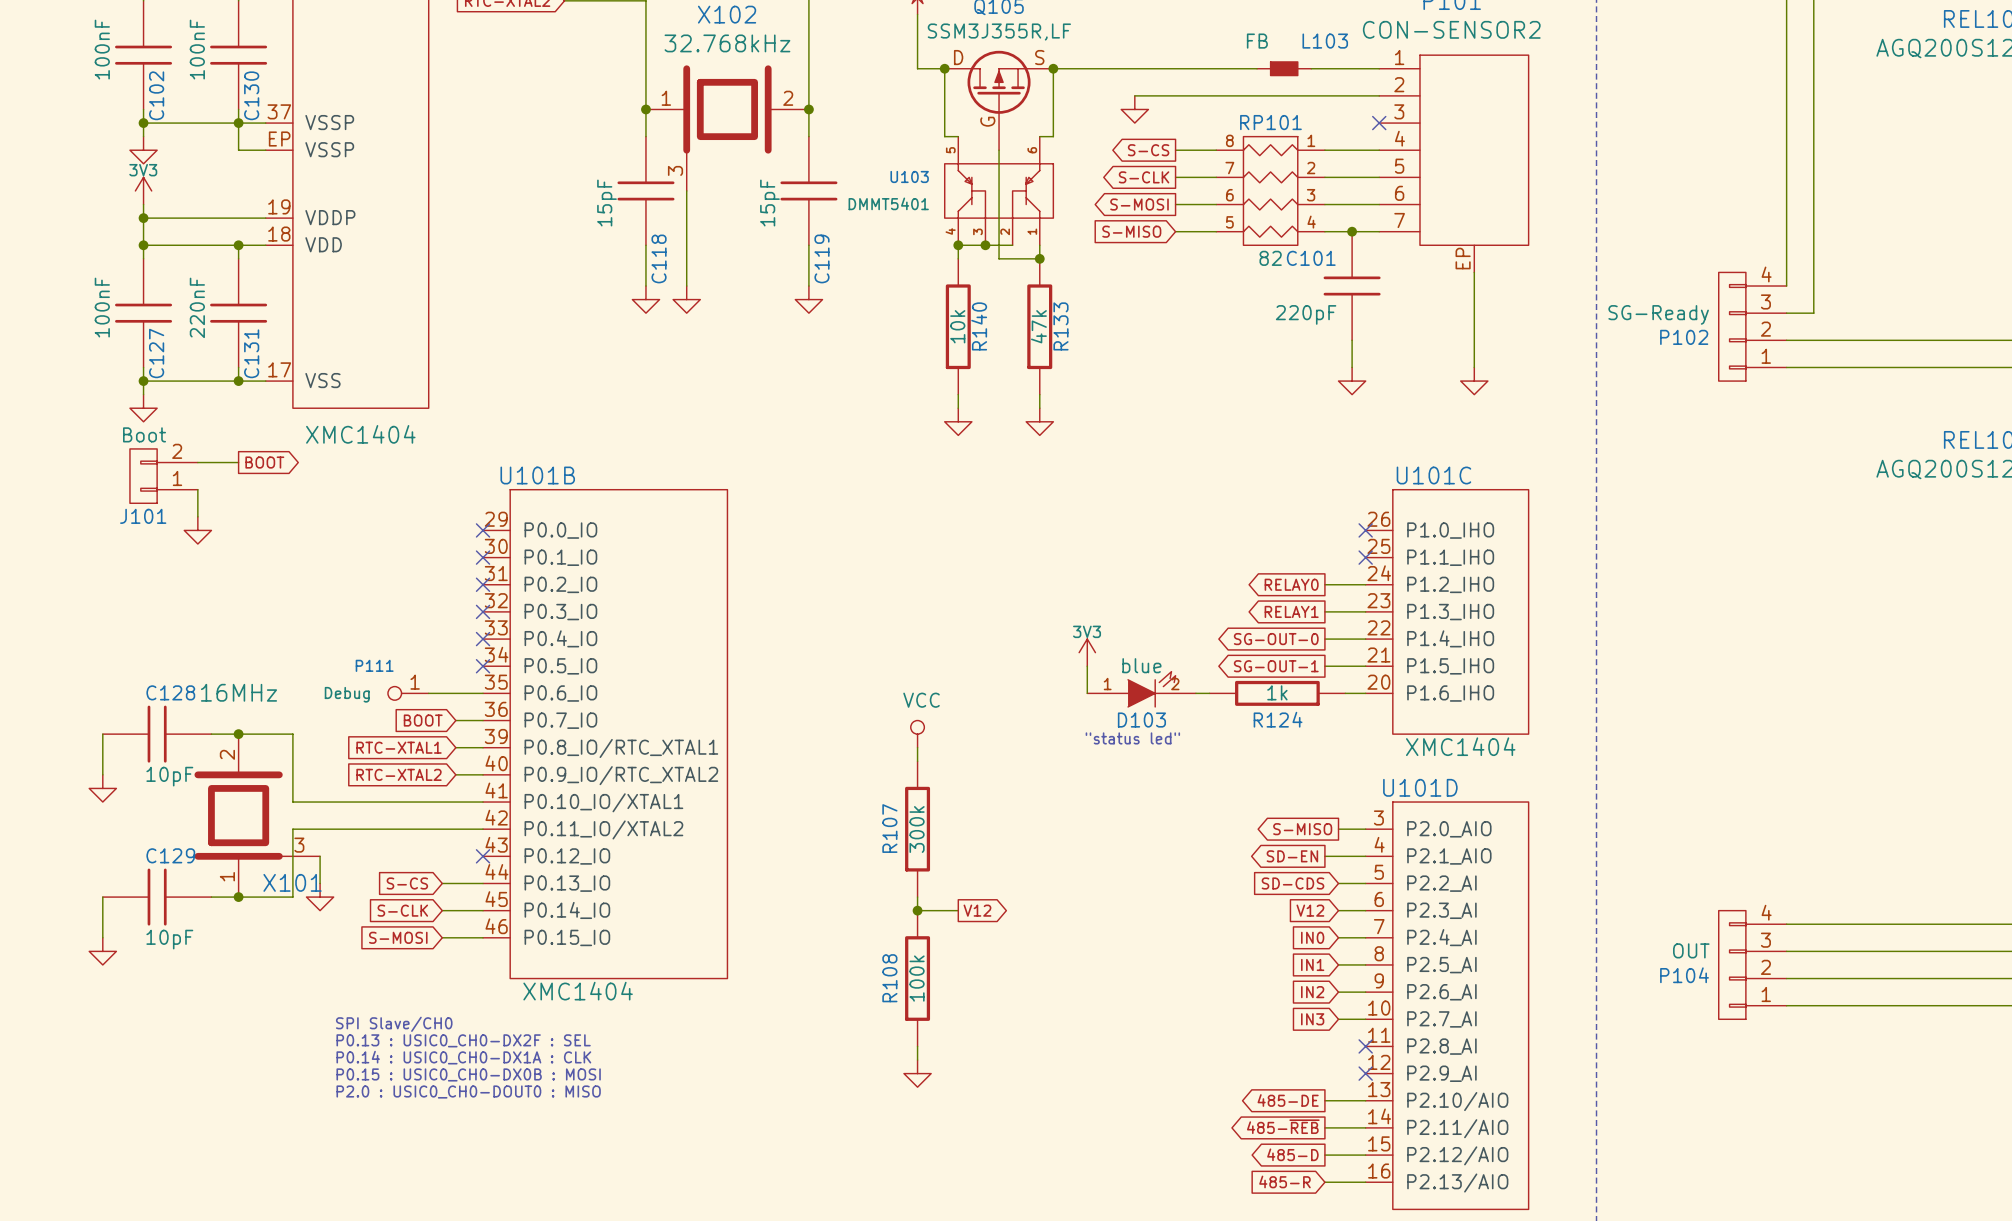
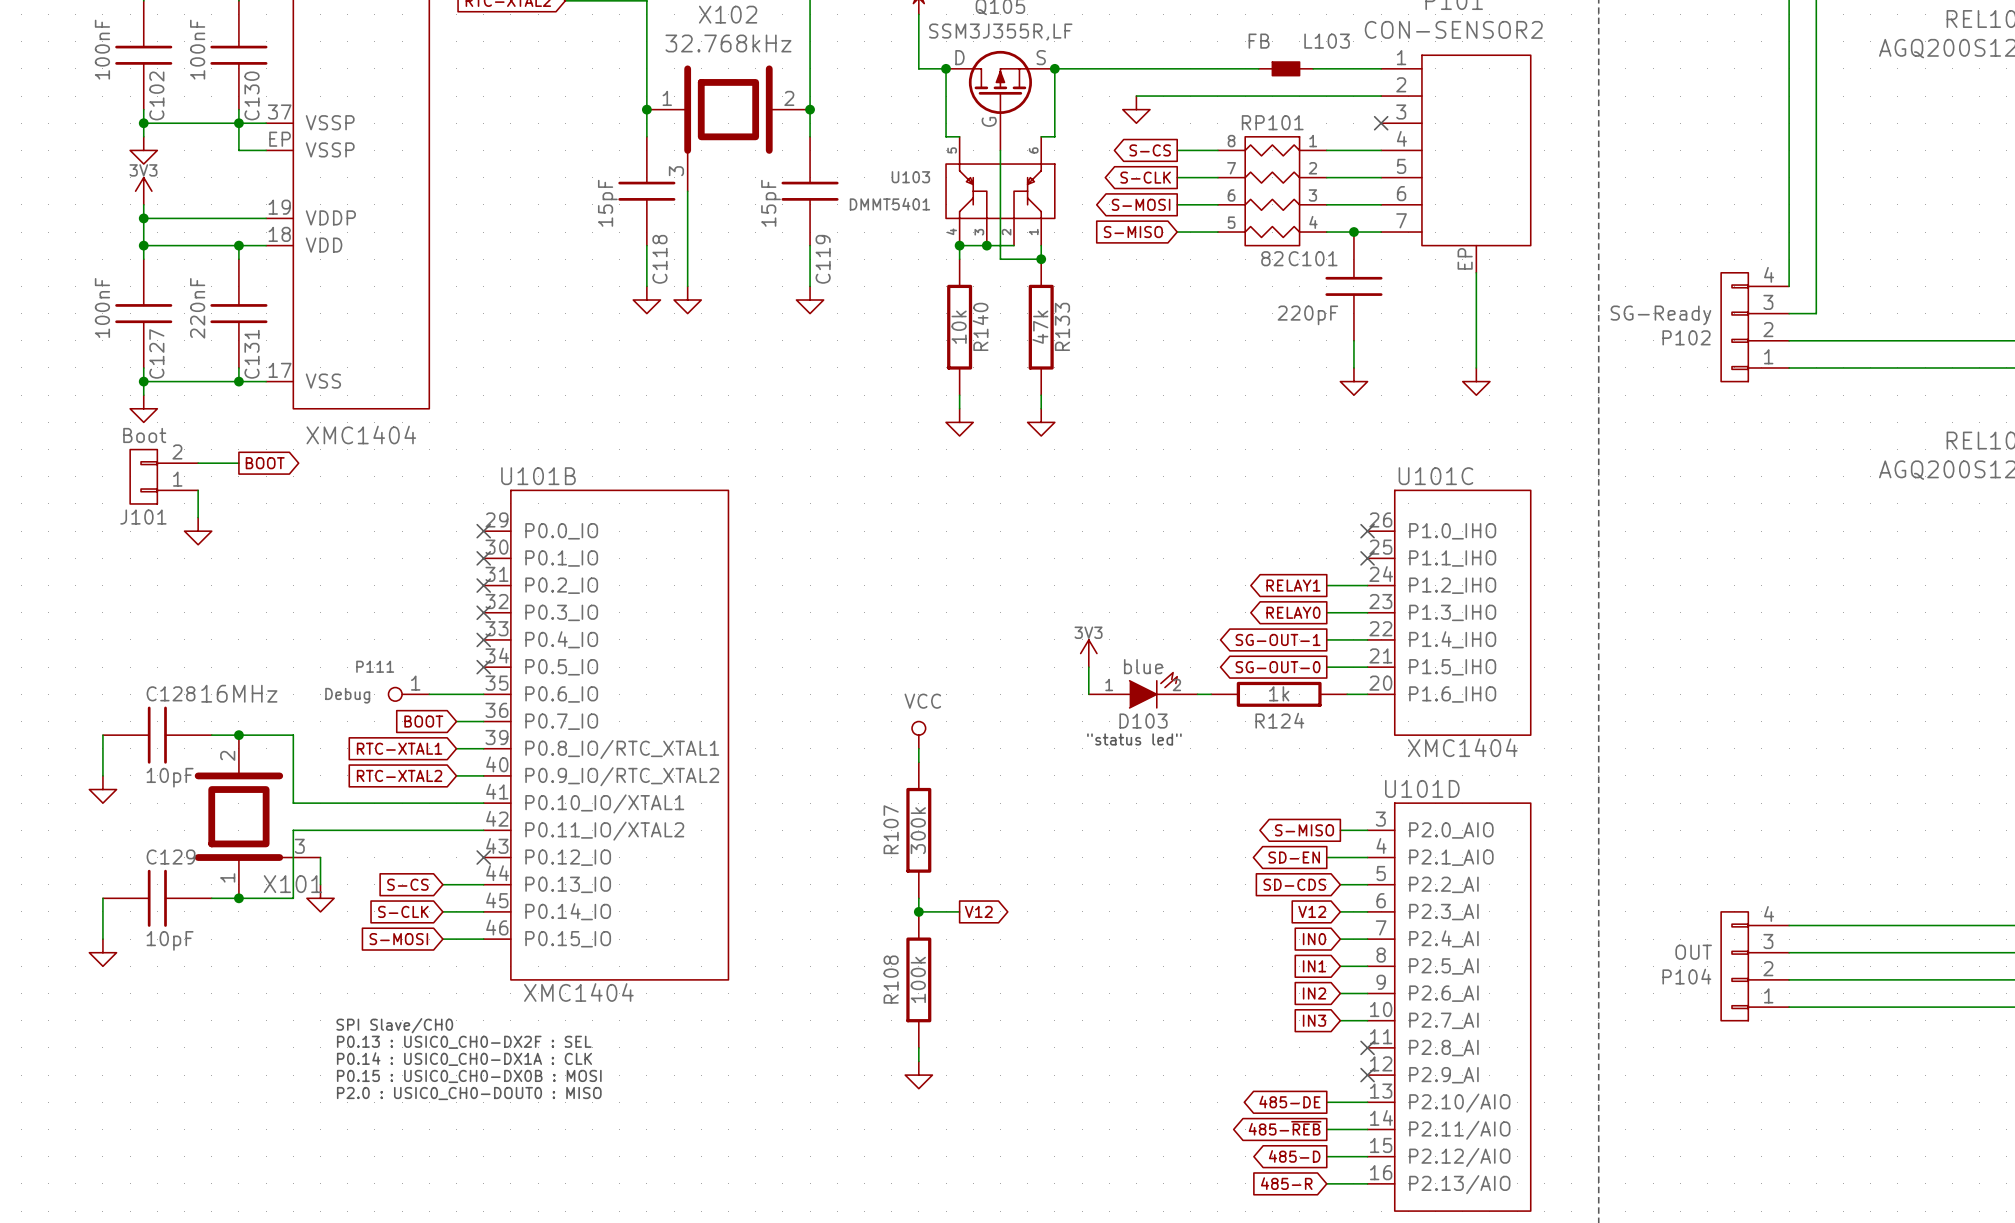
global label: RELAY0 (1291, 584) -> RELAY1 (1293, 585)
global label: RELAY1 (1291, 611) -> RELAY0 (1293, 612)
global label: SG-OUT-0 (1276, 639) -> SG-OUT-1 (1278, 639)
global label: SG-OUT-1 (1276, 666) -> SG-OUT-0 (1278, 667)

